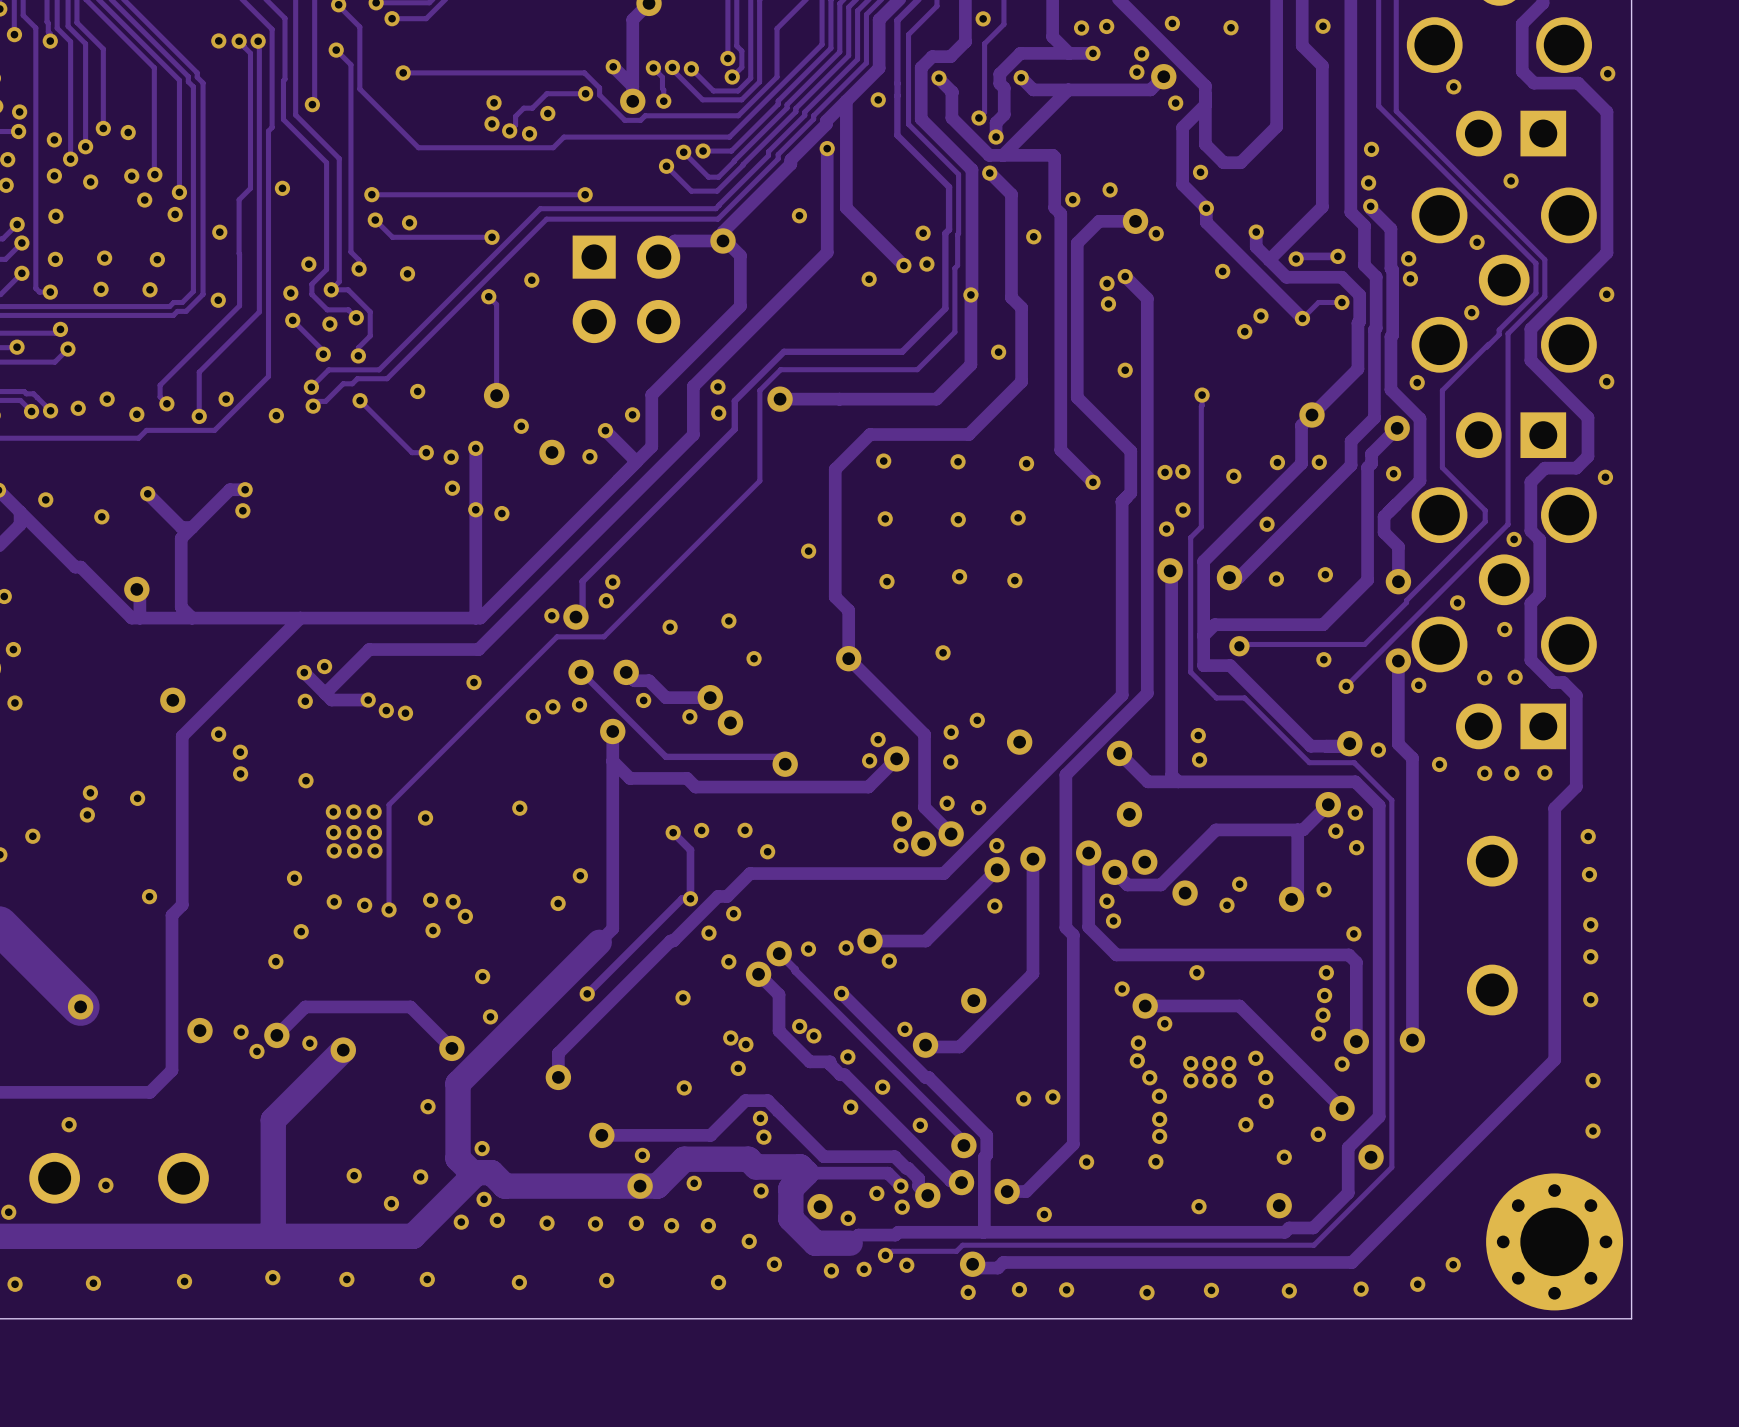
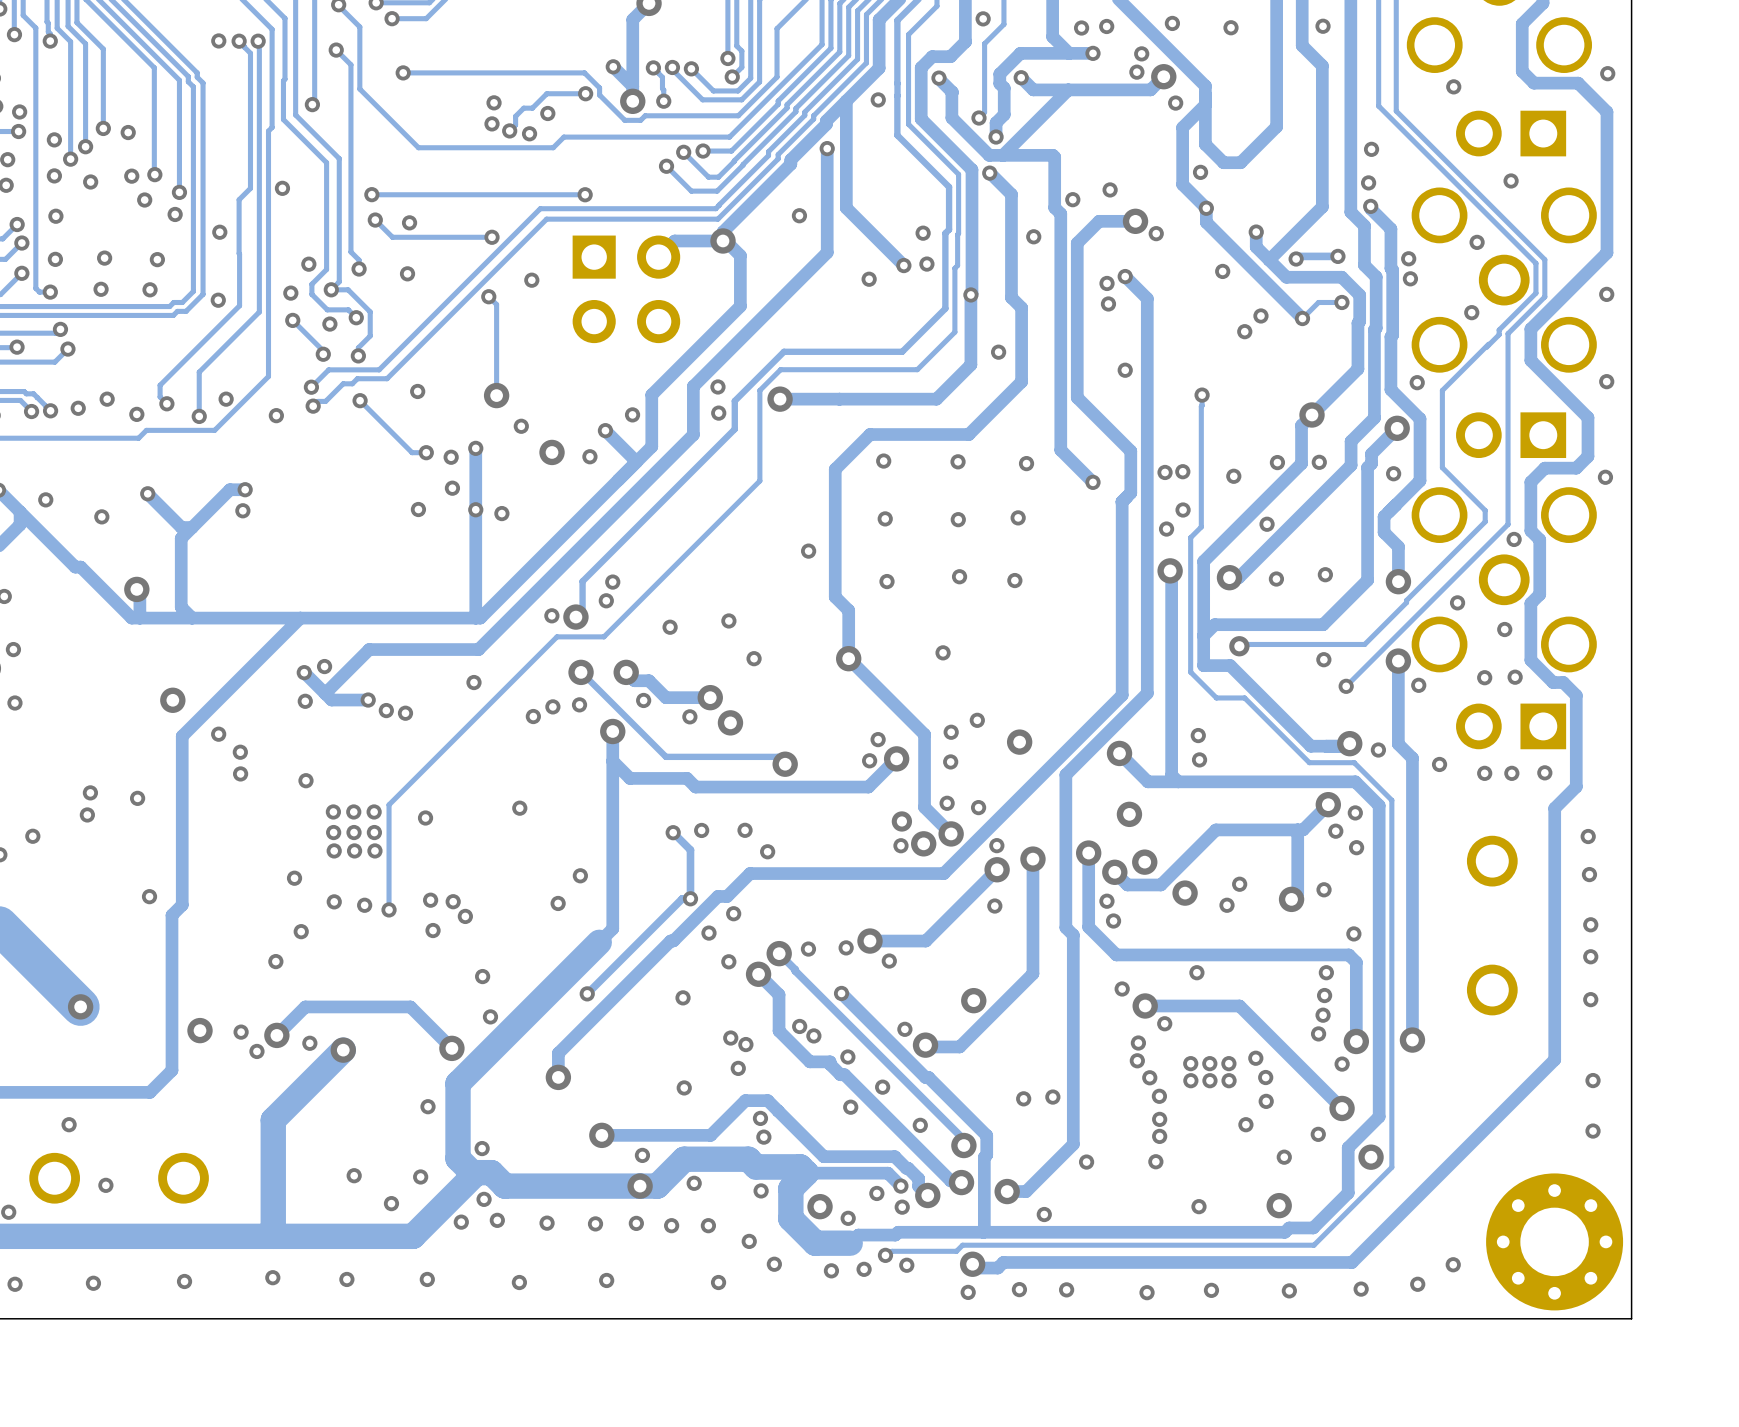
via: none -> (418, 509)

